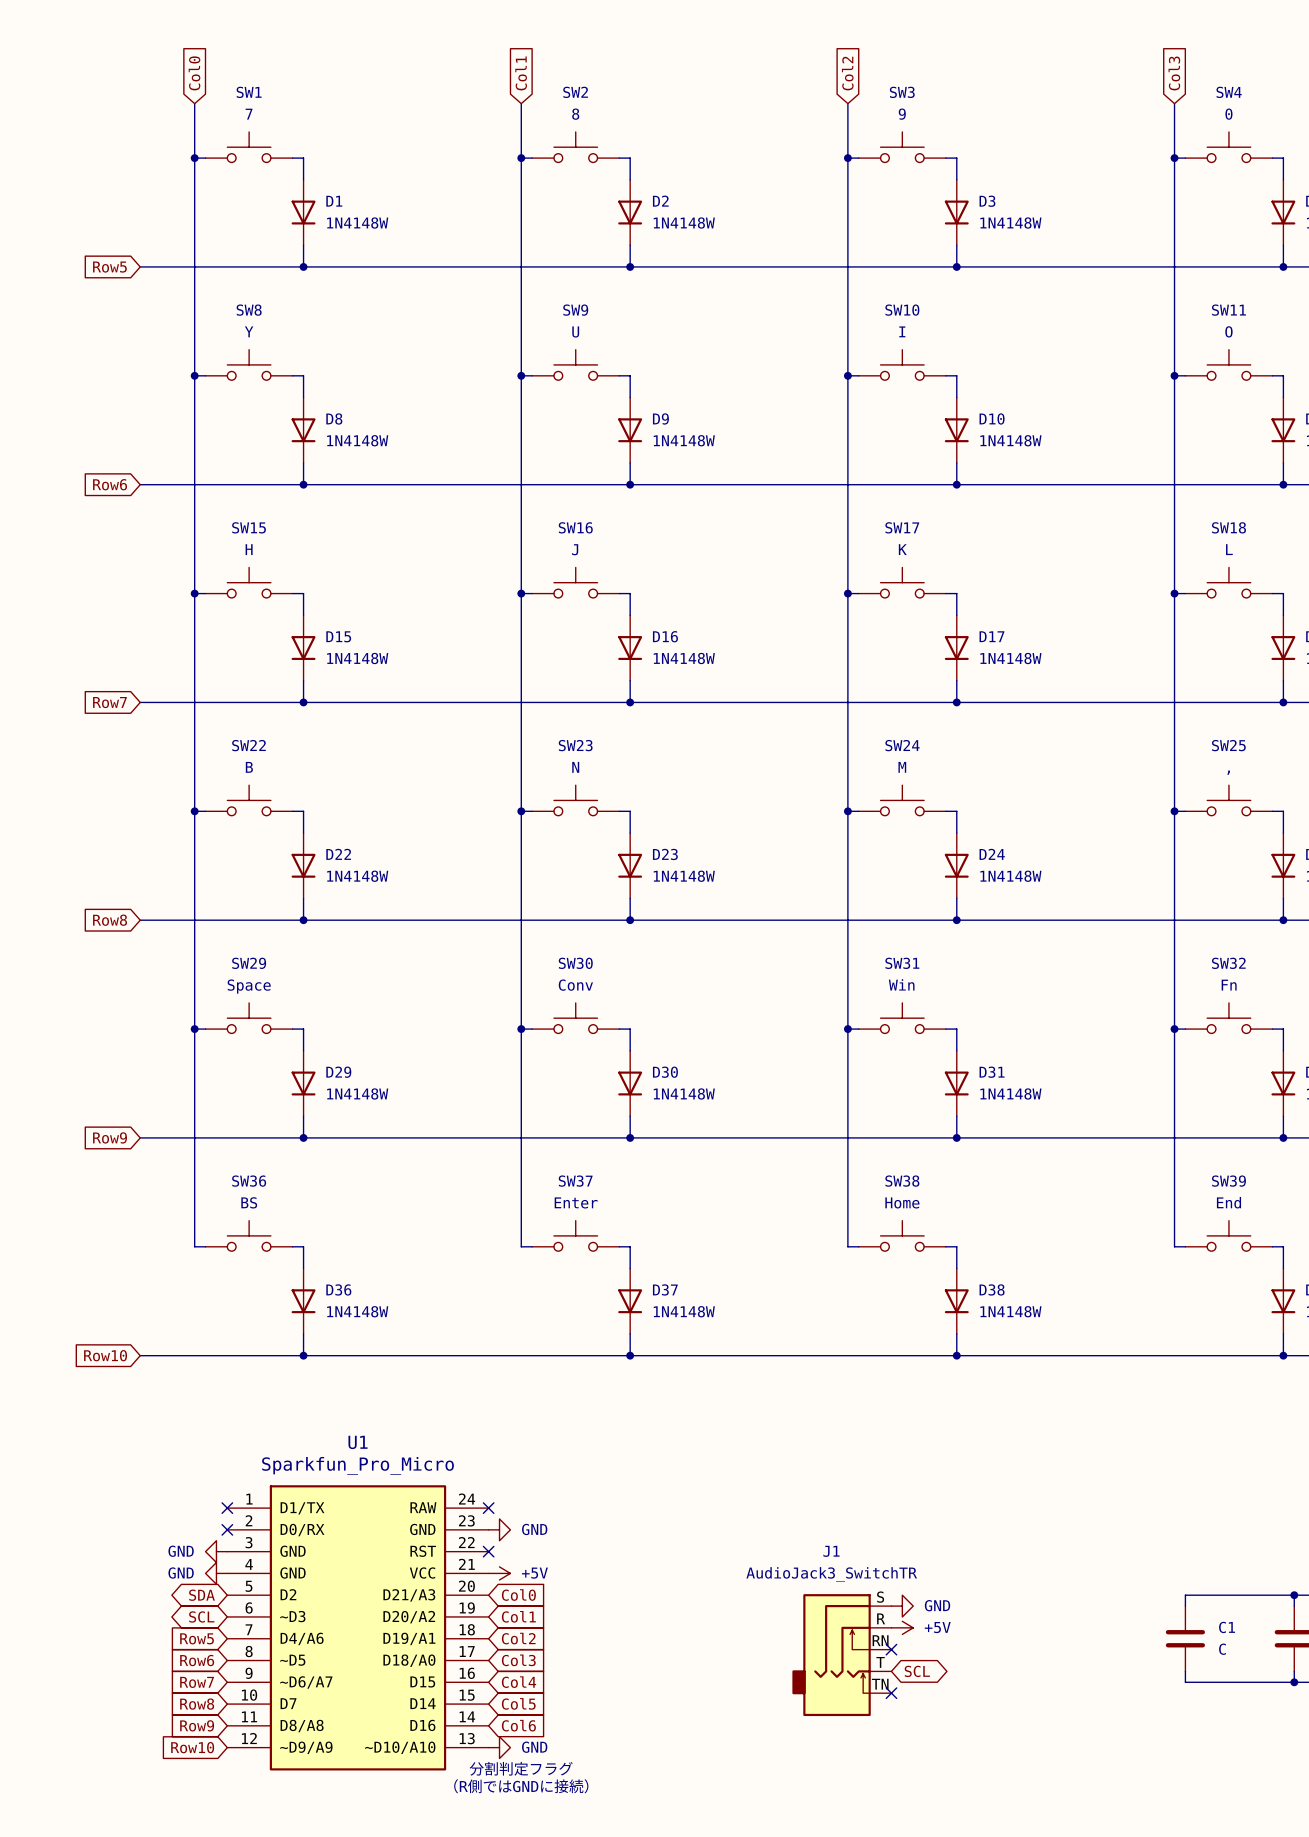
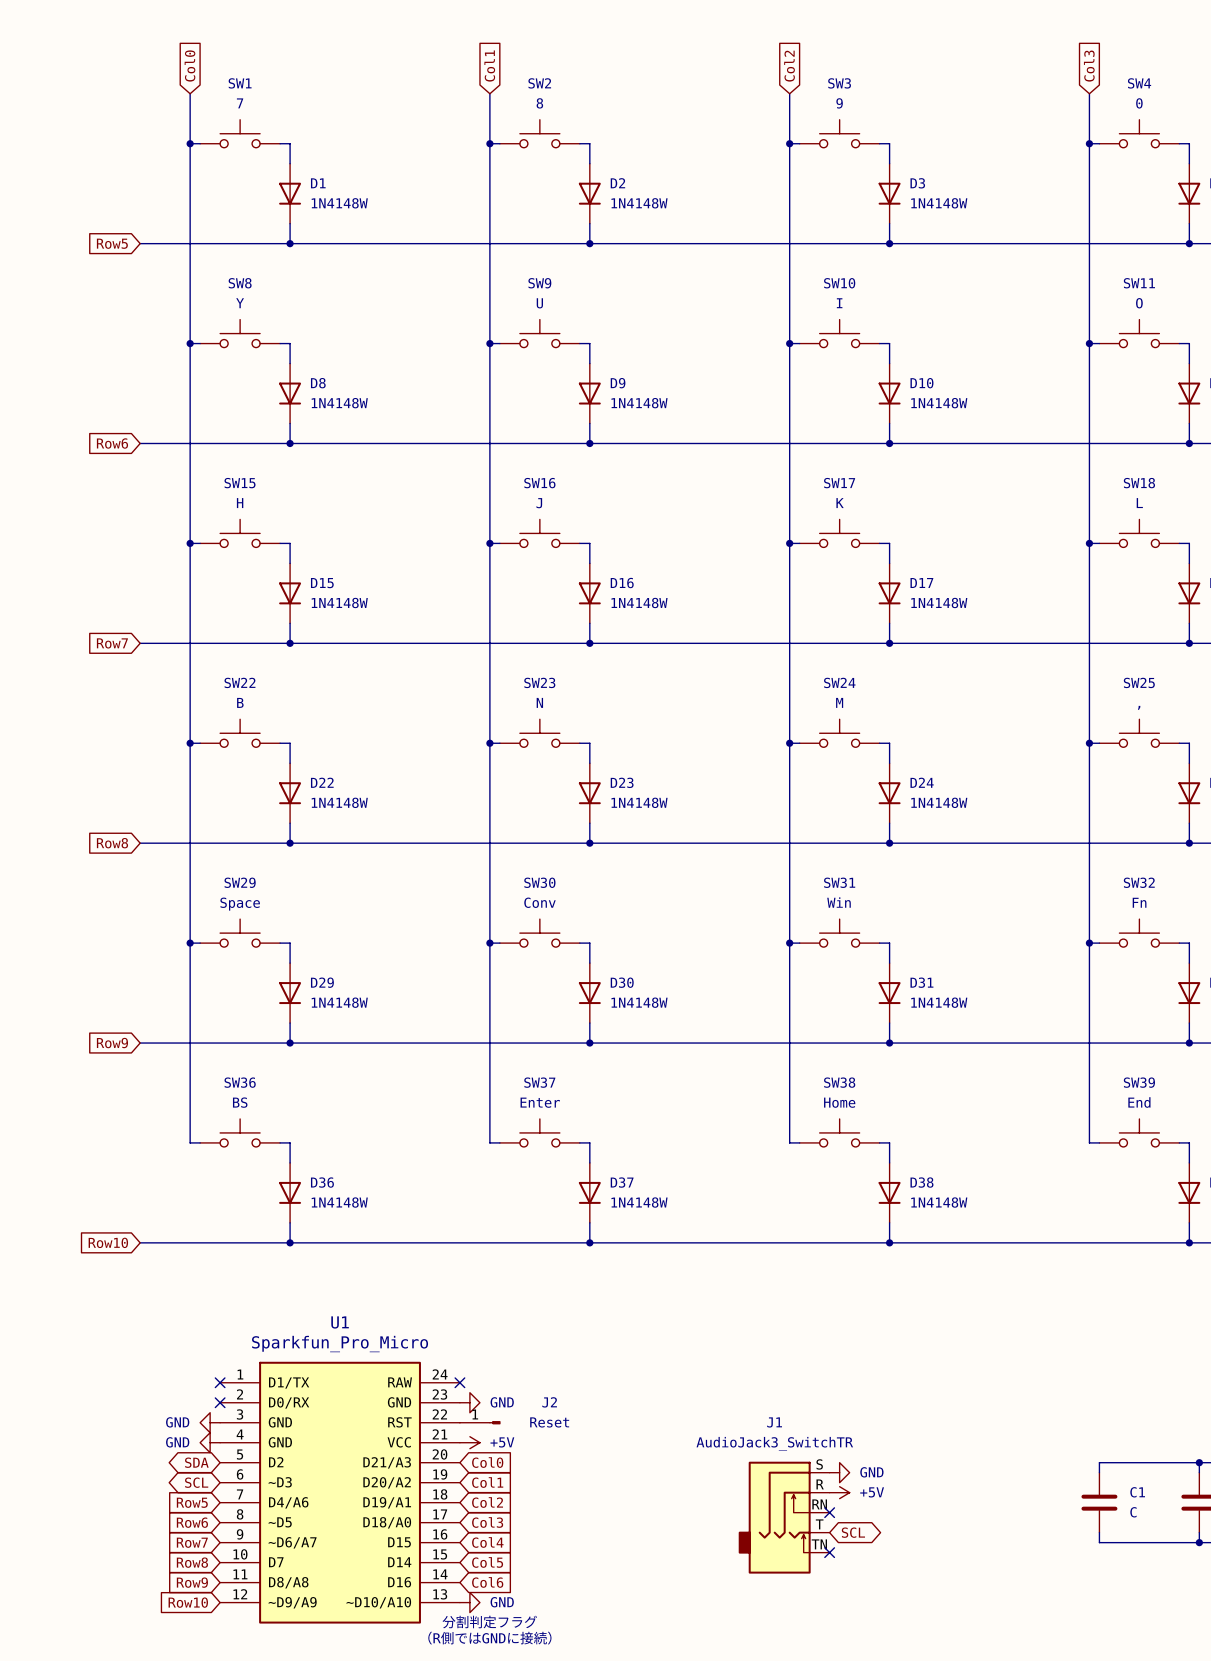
no-connect mark: (488, 1551) -> none
J2: none -> Reset (480, 1422)

